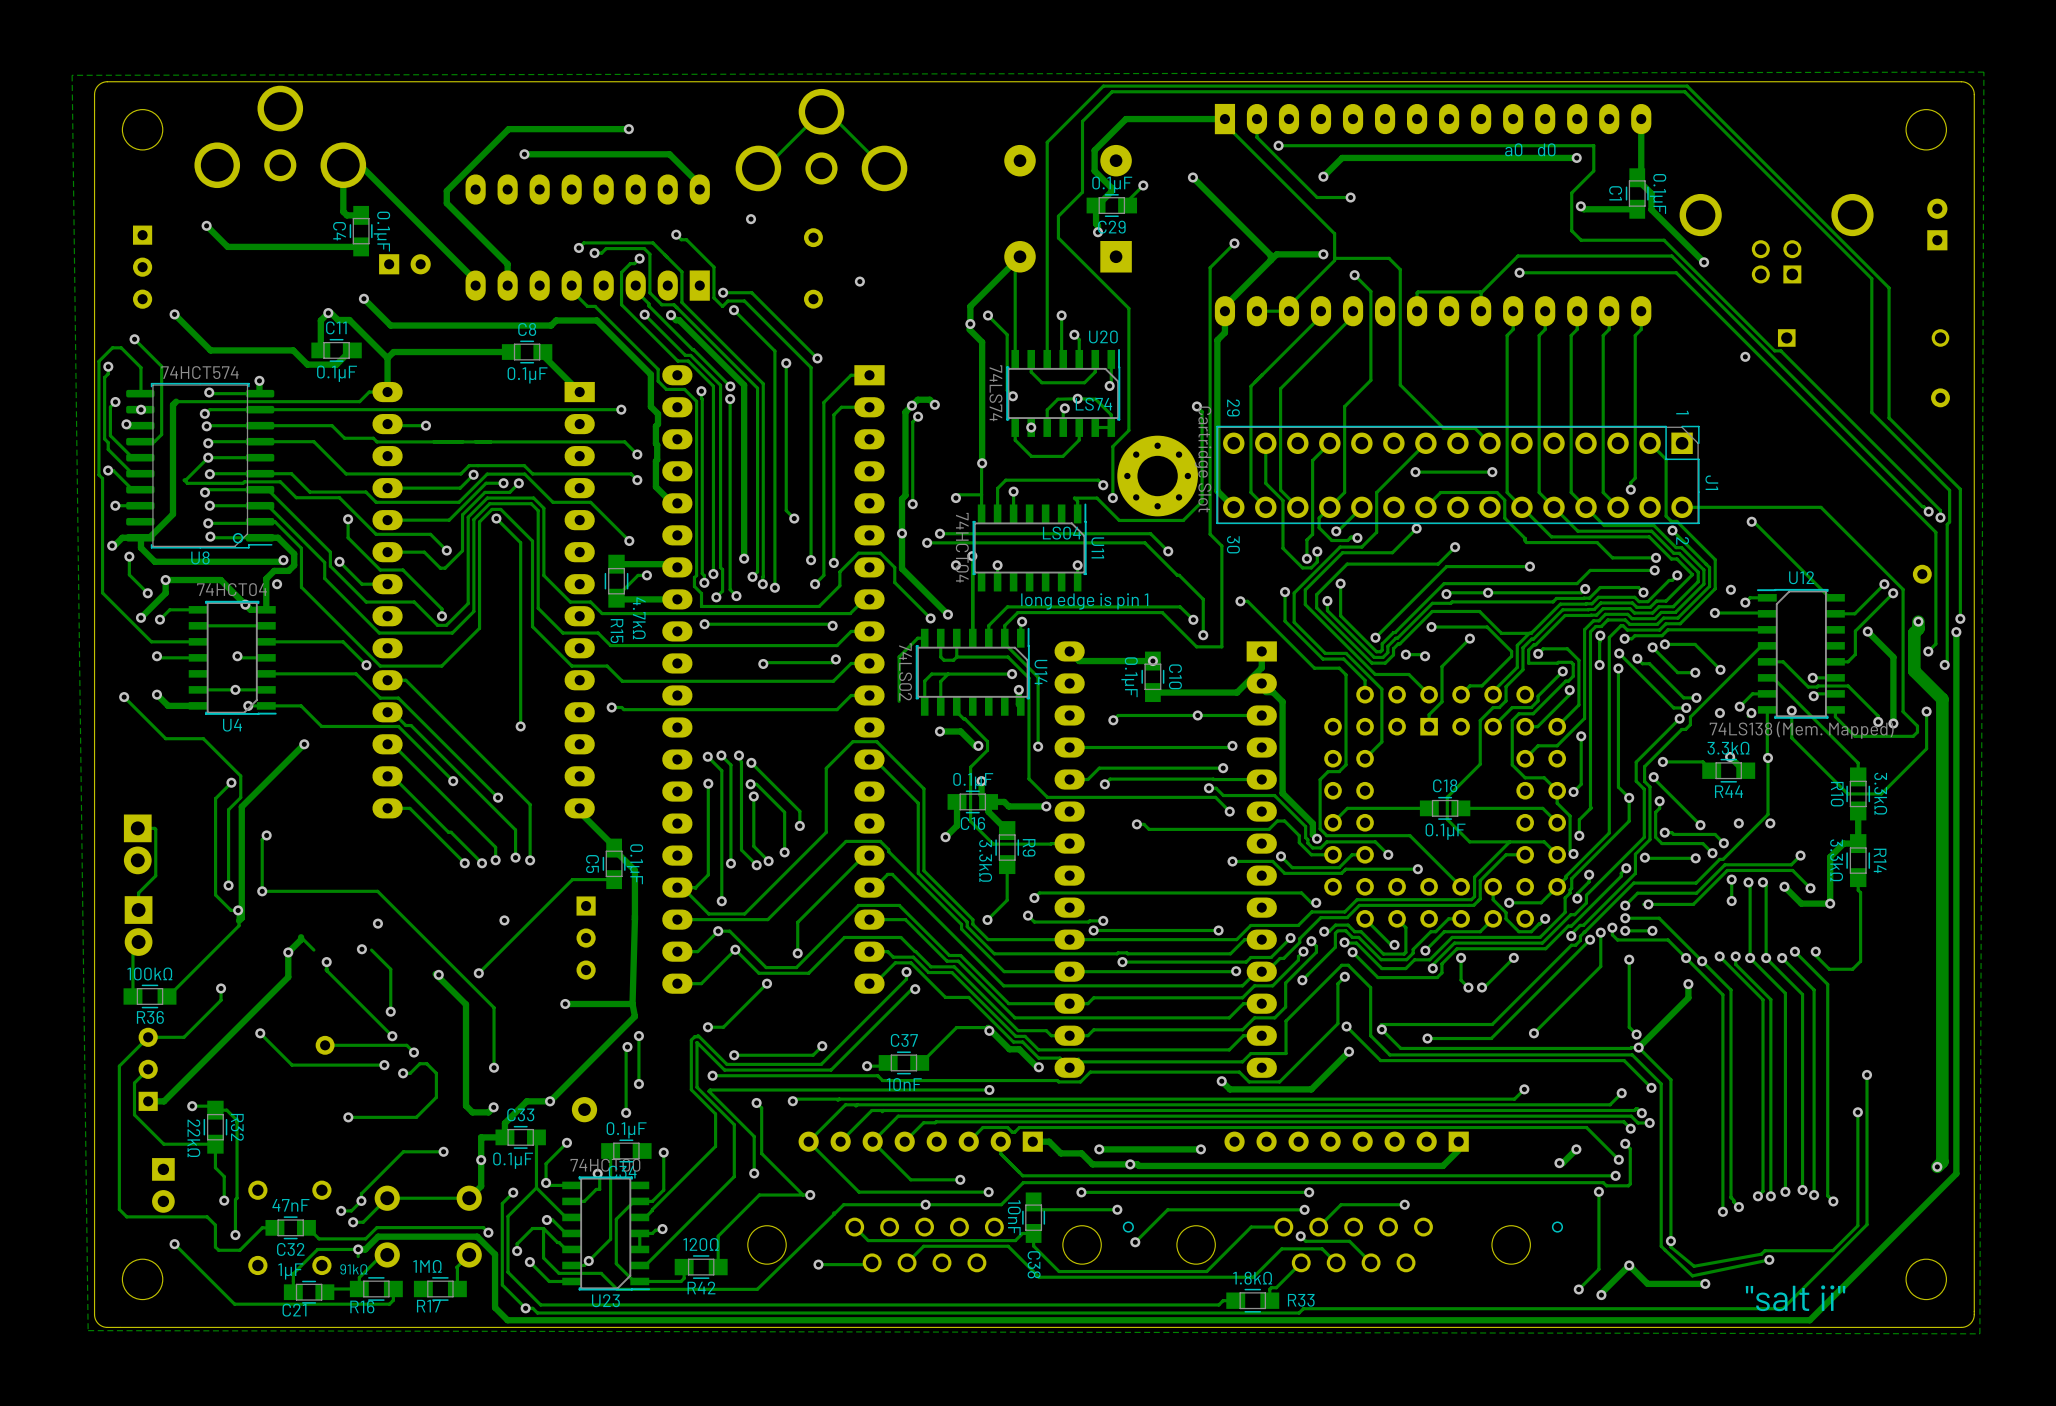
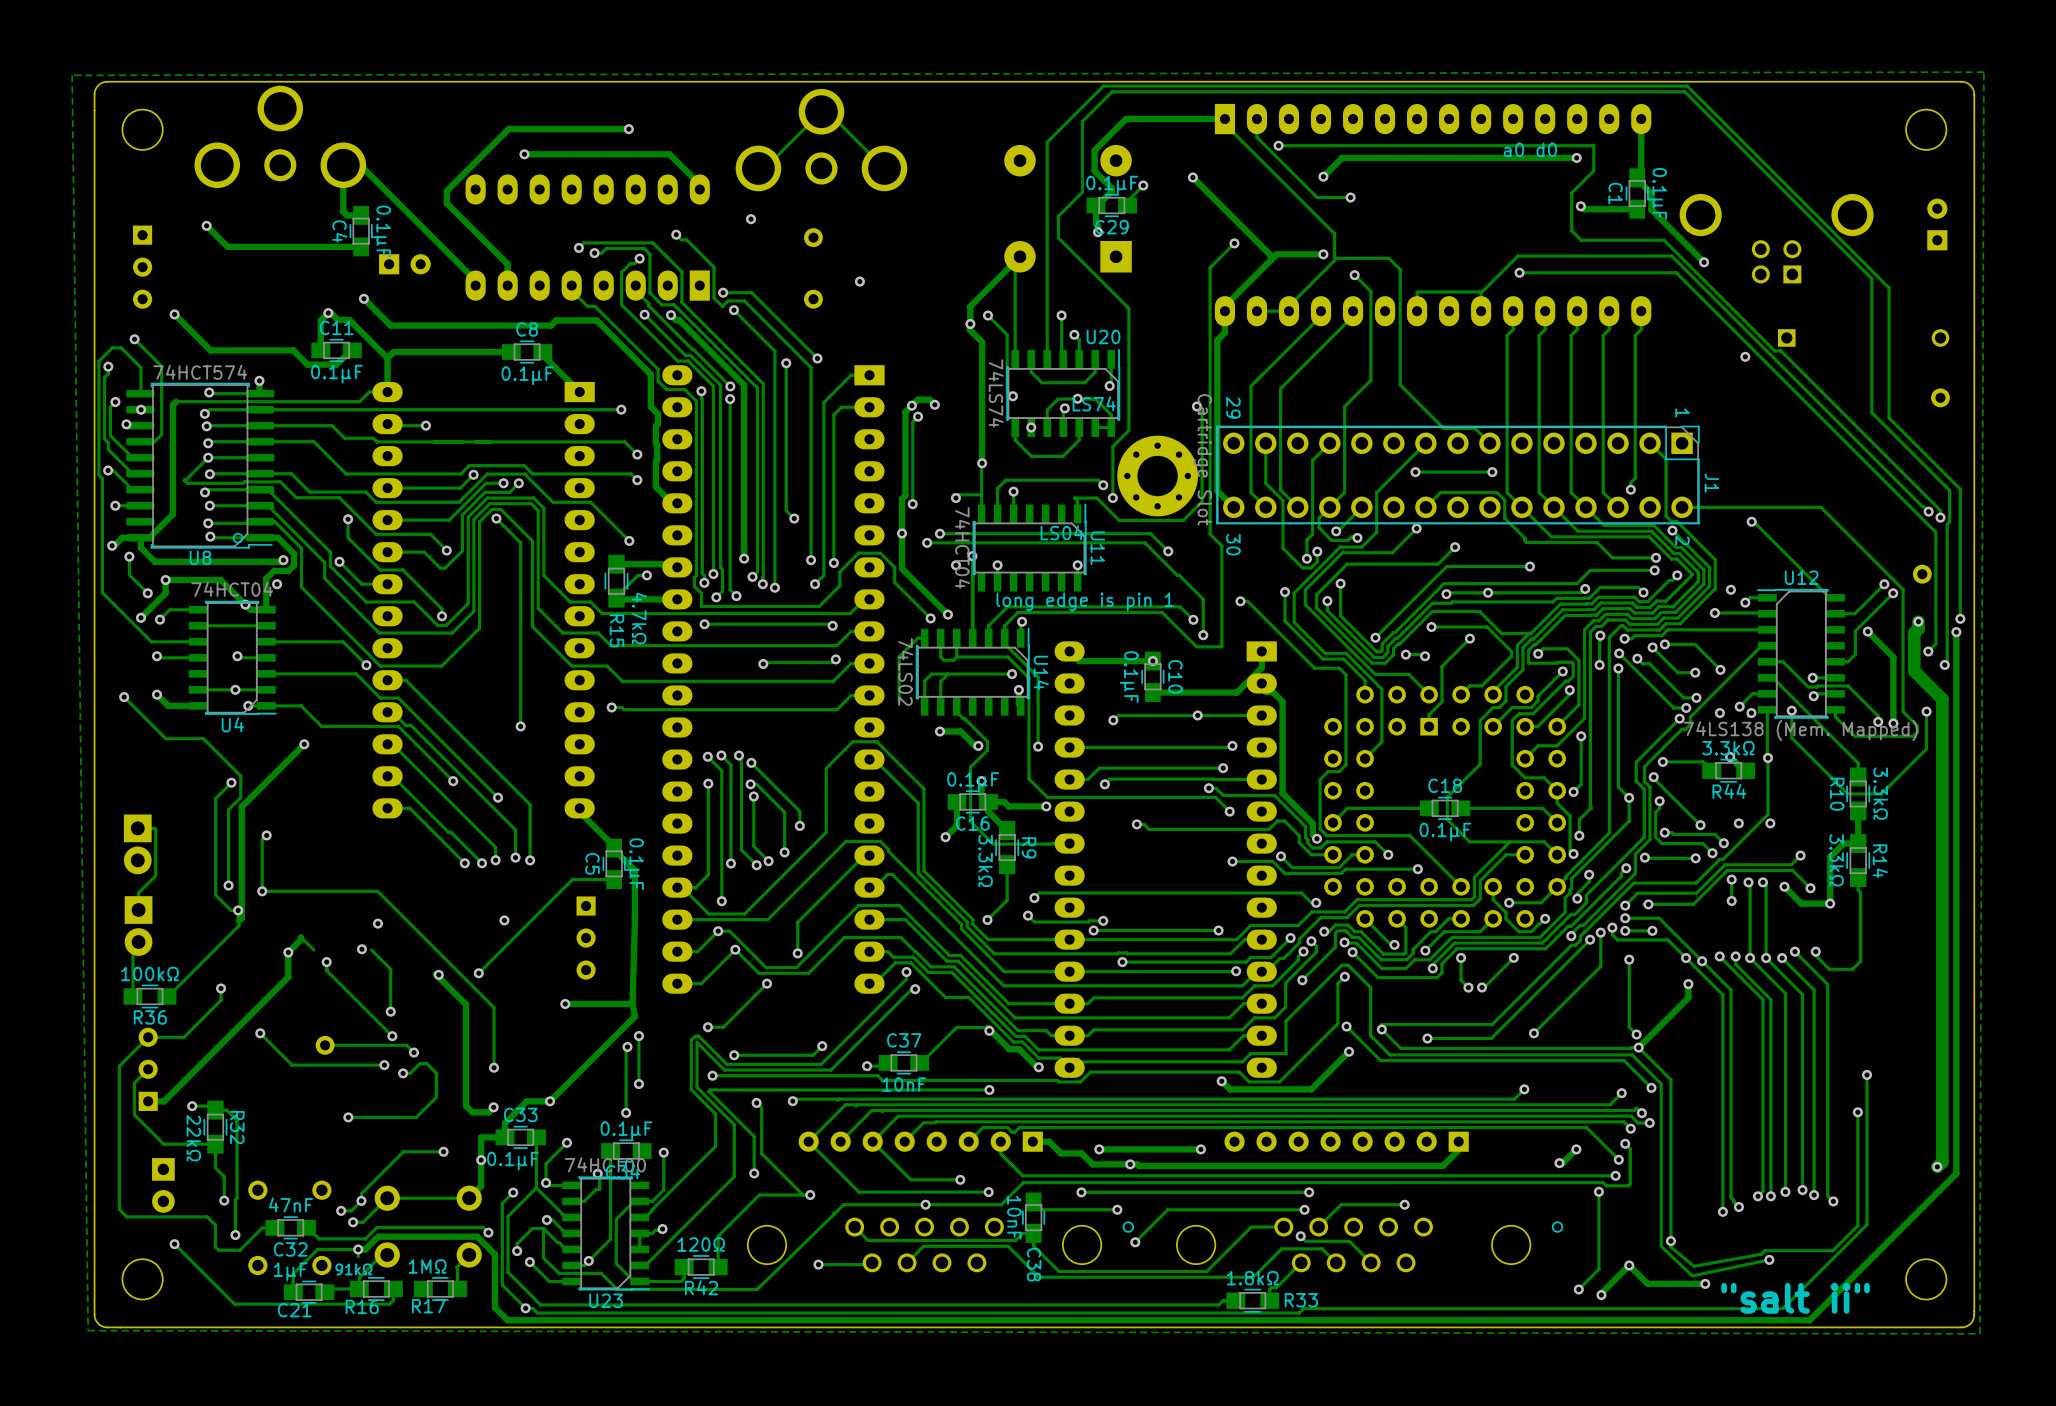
part: (584, 1109) -> none

